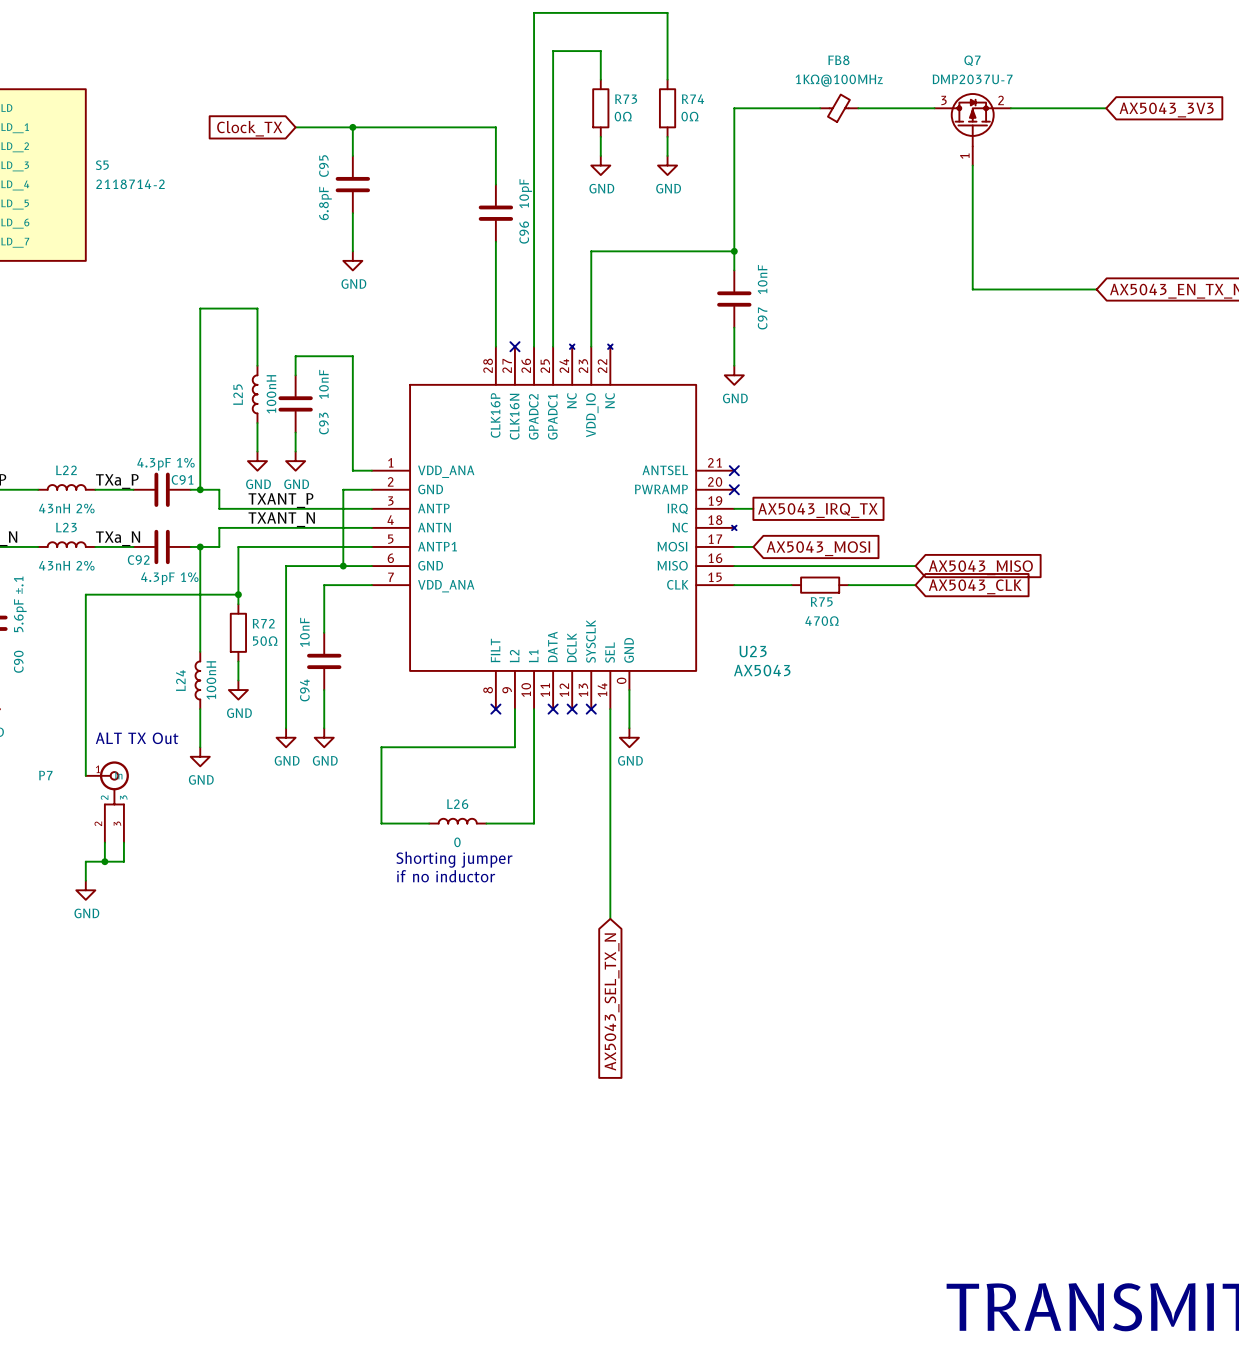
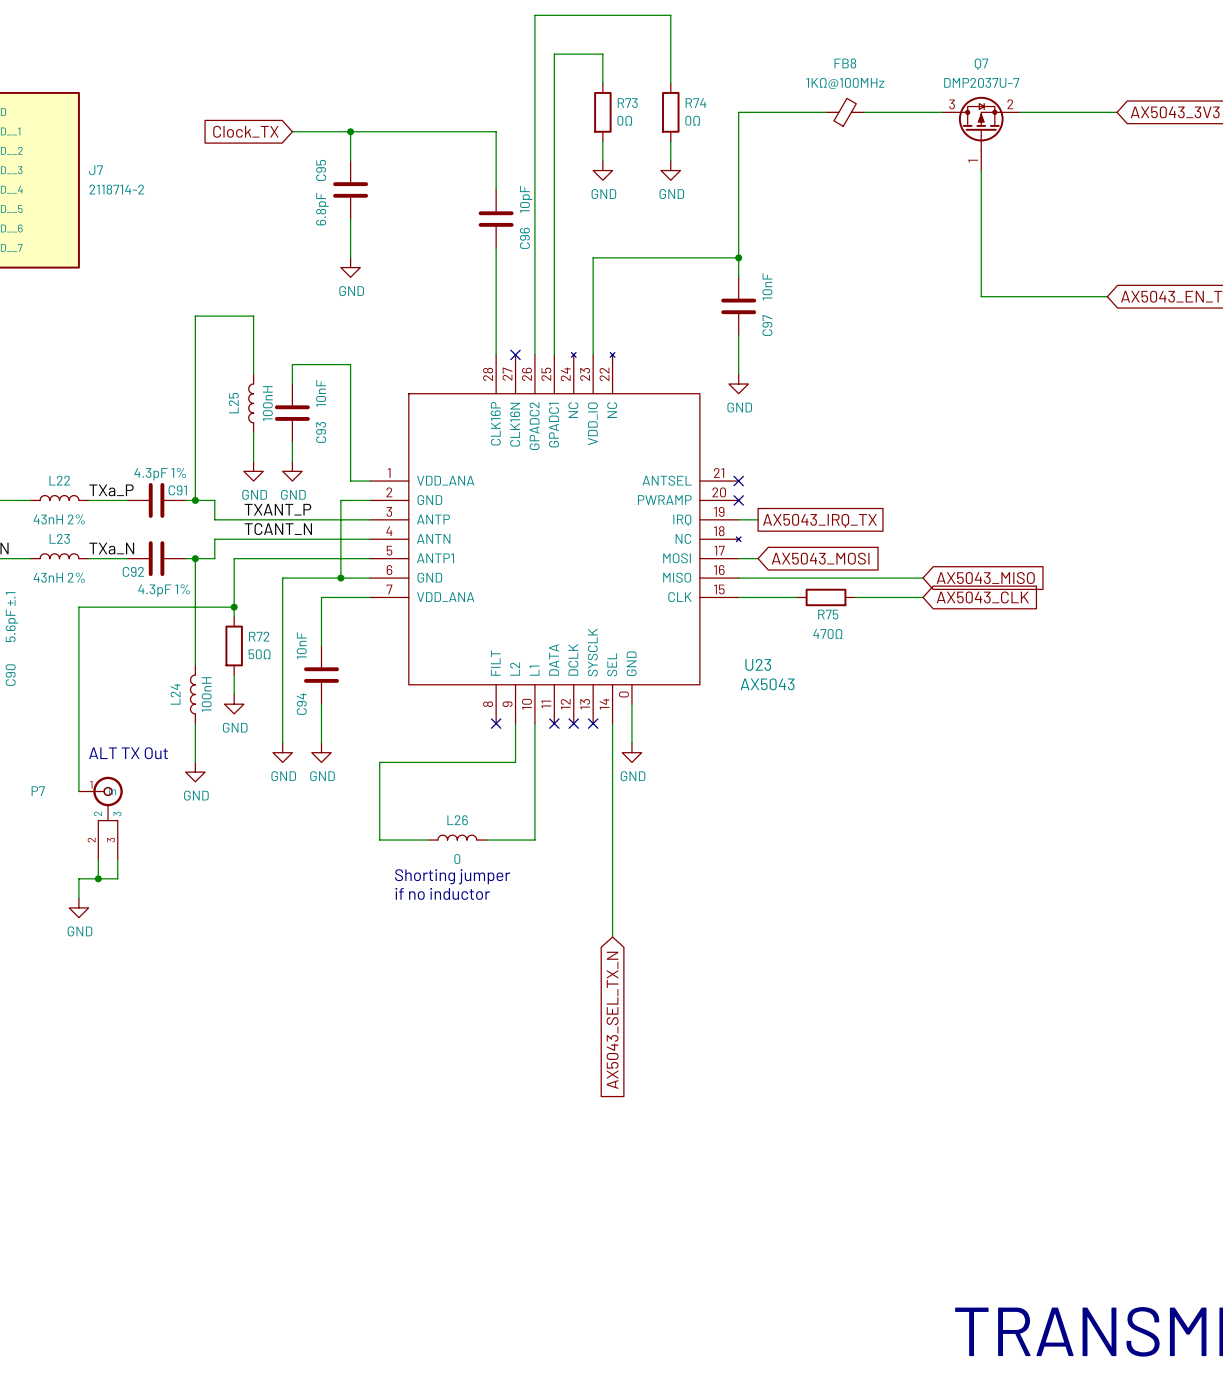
S5 name: S5 (102, 165) -> J7 (95, 170)
label: TXANT_N (281, 519) -> TCANT_N (278, 529)

